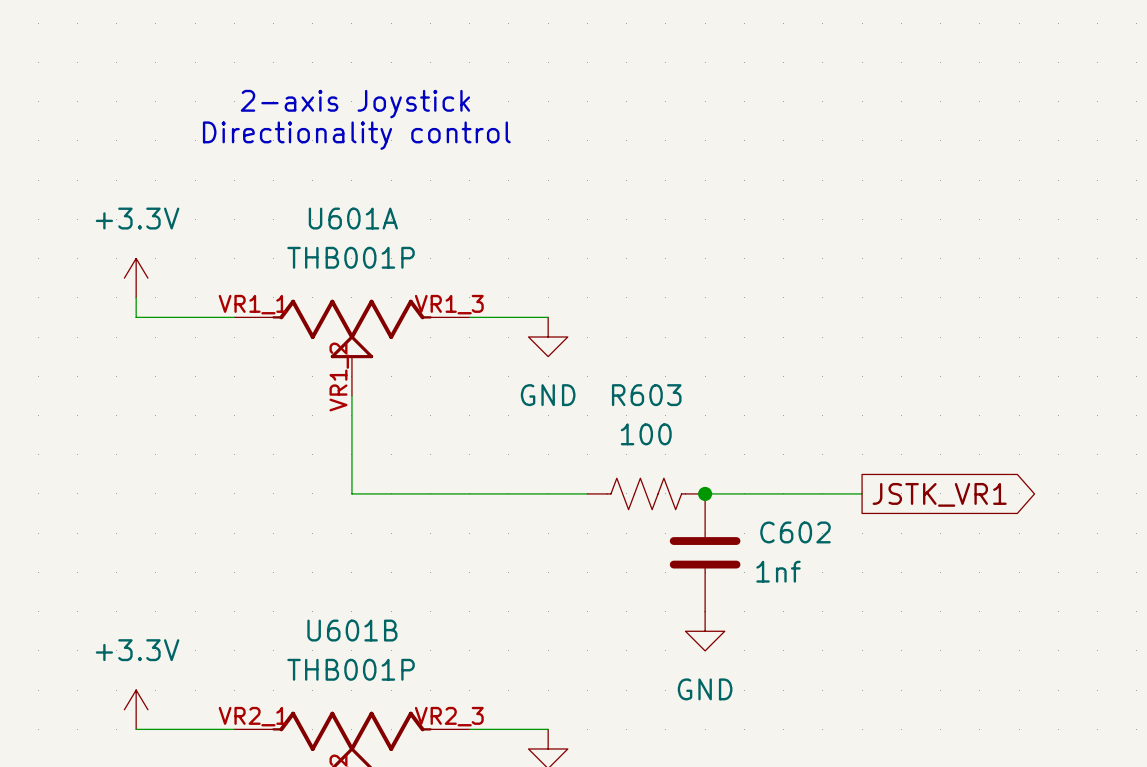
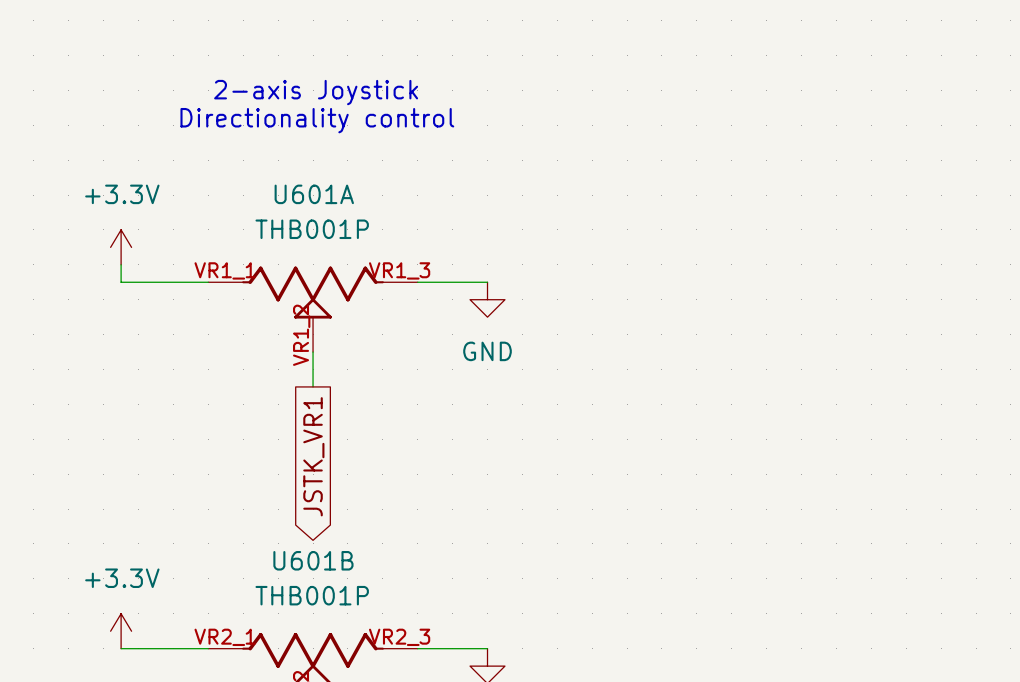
wire: (351, 435) (351, 493) (587, 493) -> none
R603: 100 (646, 493) -> none
wire: (705, 493) (862, 493) -> none
junction: (705, 493) -> none
global label: JSTK_VR1 (939, 494) -> none
global label: none -> JSTK_VR1 (313, 456)
C602: 1nf (705, 552) -> none
power symbol: GND (705, 631) -> none

